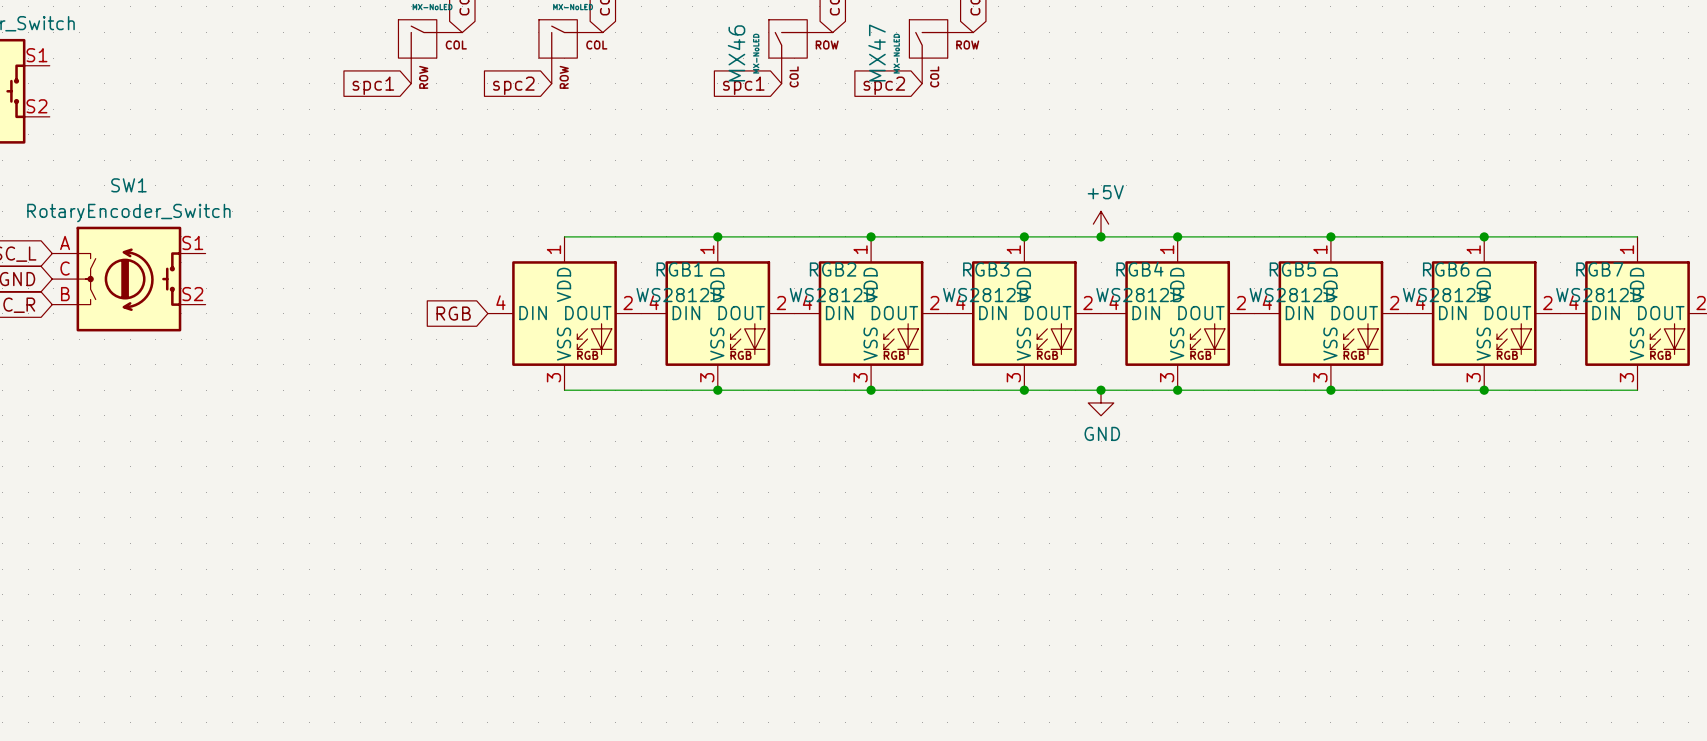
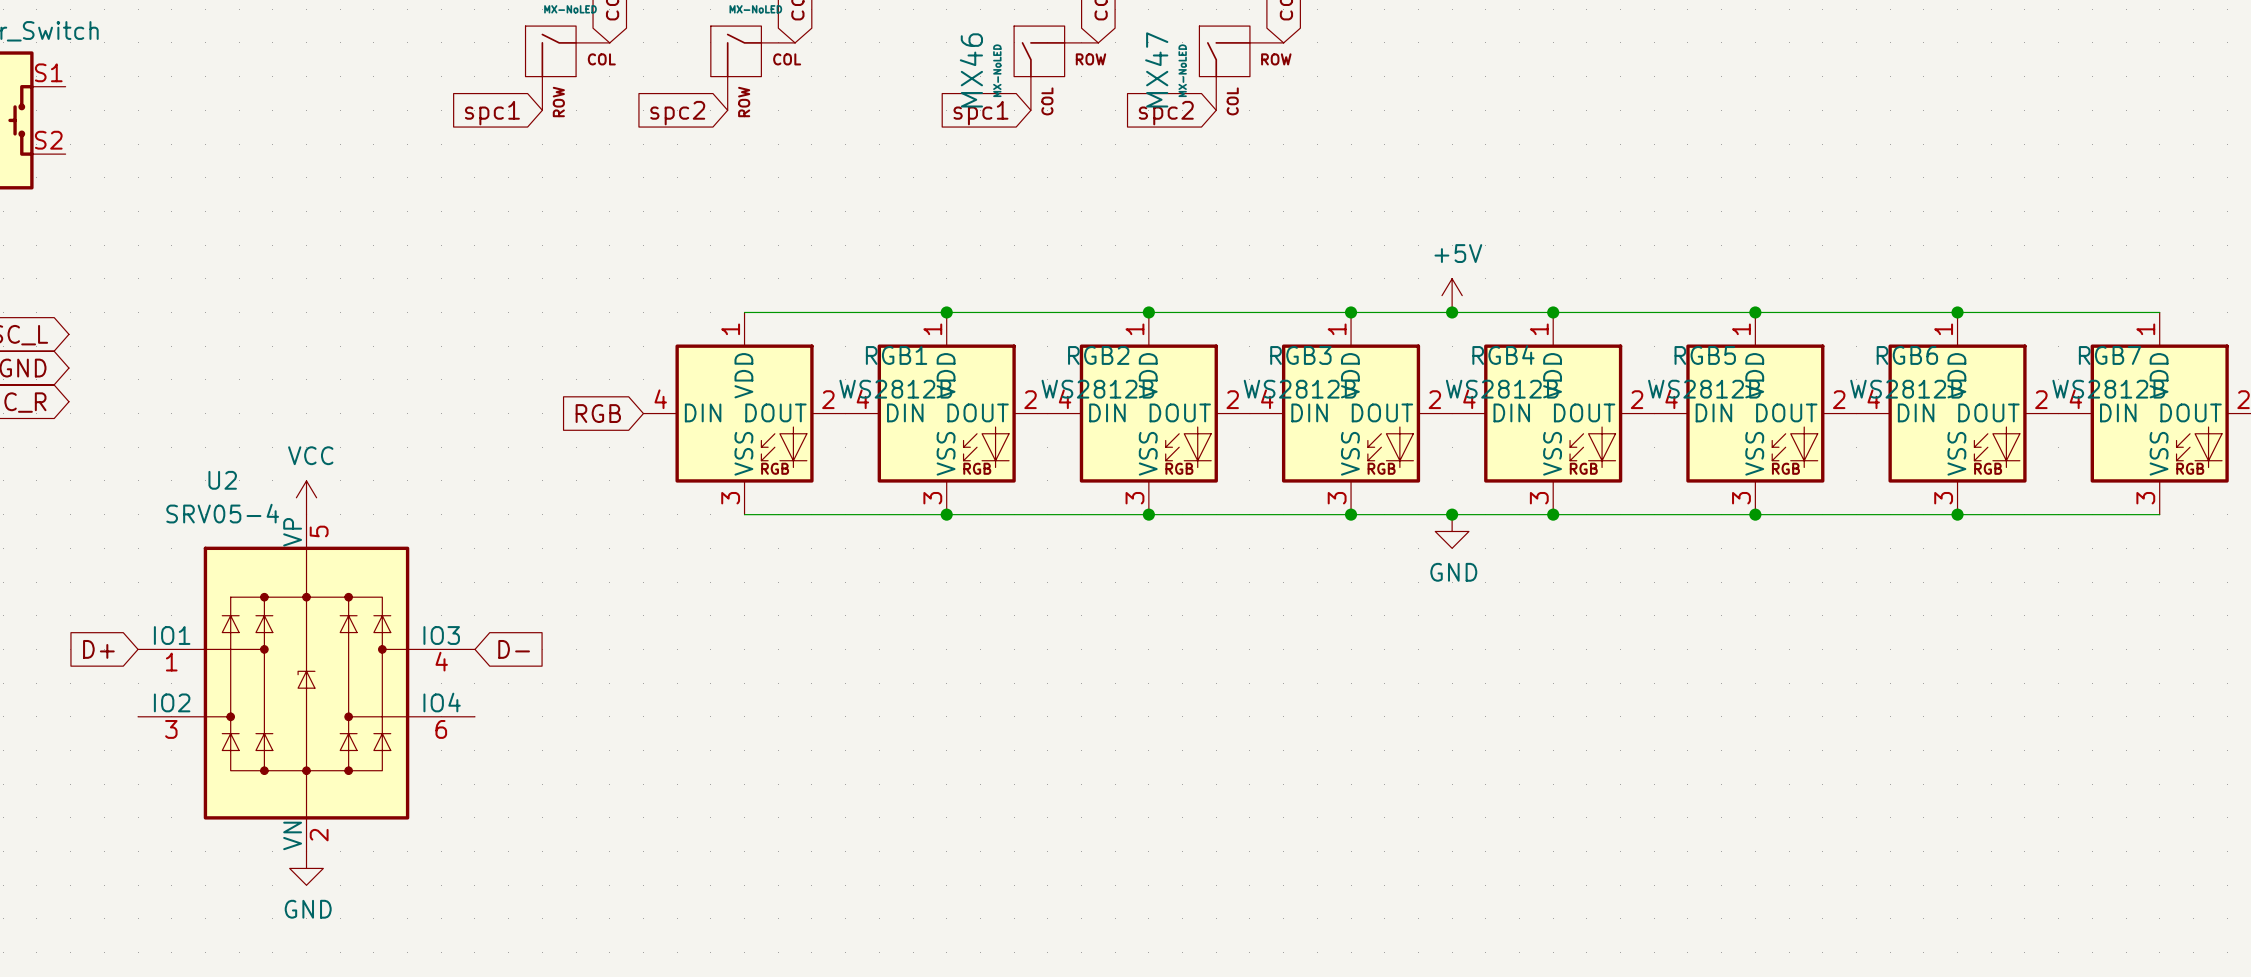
SW1: RotaryEncoder_Switch (128, 279) -> none
power symbol: none -> VCC (306, 497)
global label: none -> D+ (98, 649)
global label: none -> D- (514, 649)
U2: none -> SRV05-4 (306, 683)
power symbol: none -> GND (306, 868)

